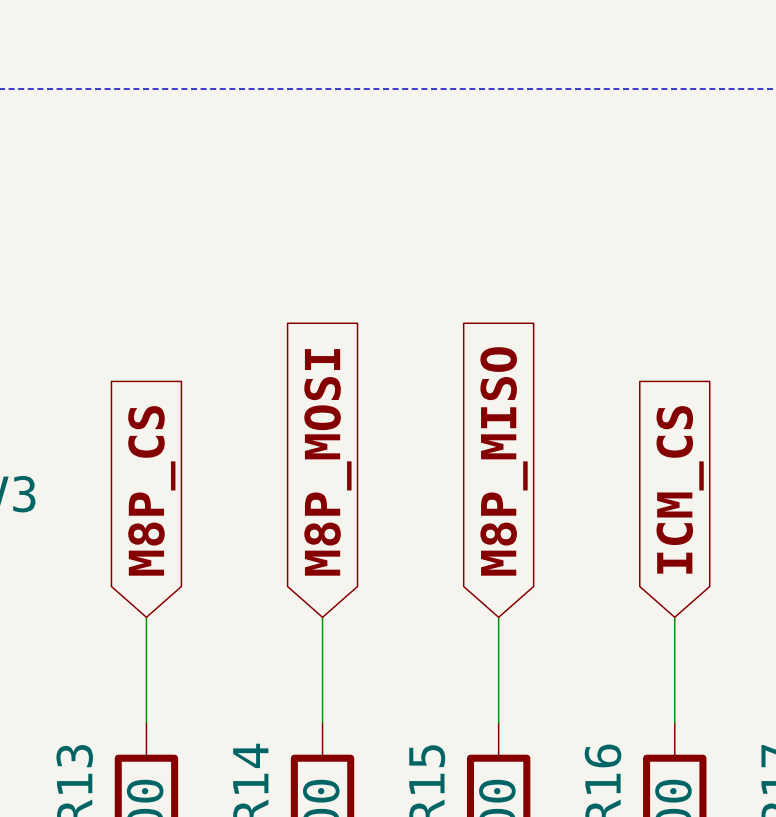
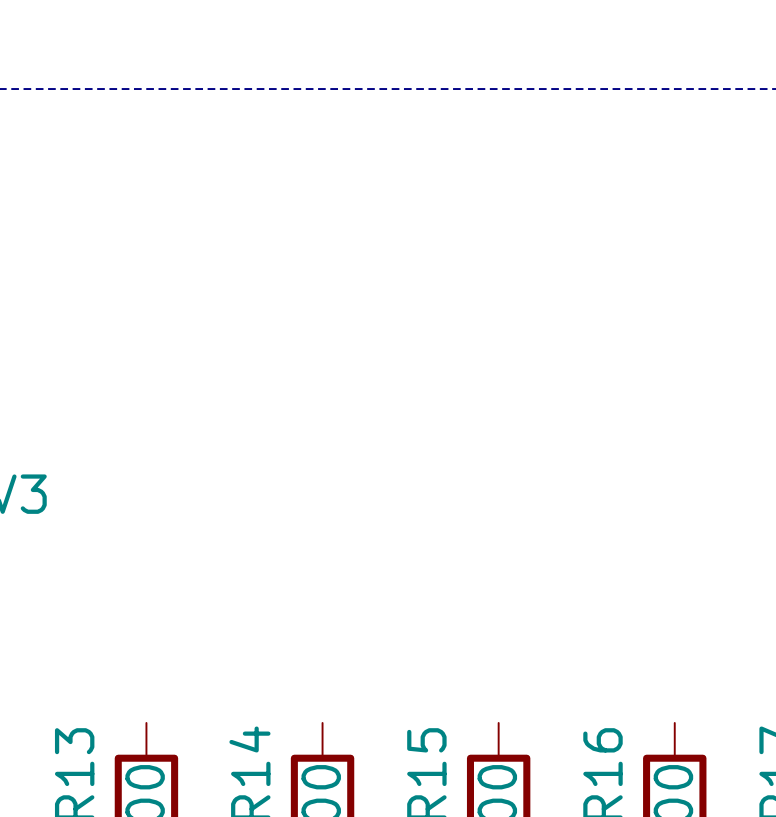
global label: M8P_MISO (504, 461) -> none
global label: M8P_MOSI (327, 462) -> none
global label: ICM_CS (680, 489) -> none
global label: M8P_CS (151, 490) -> none
wire: (146, 617) (146, 722) -> none
wire: (322, 617) (322, 722) -> none
wire: (498, 617) (498, 722) -> none
wire: (674, 617) (674, 722) -> none

